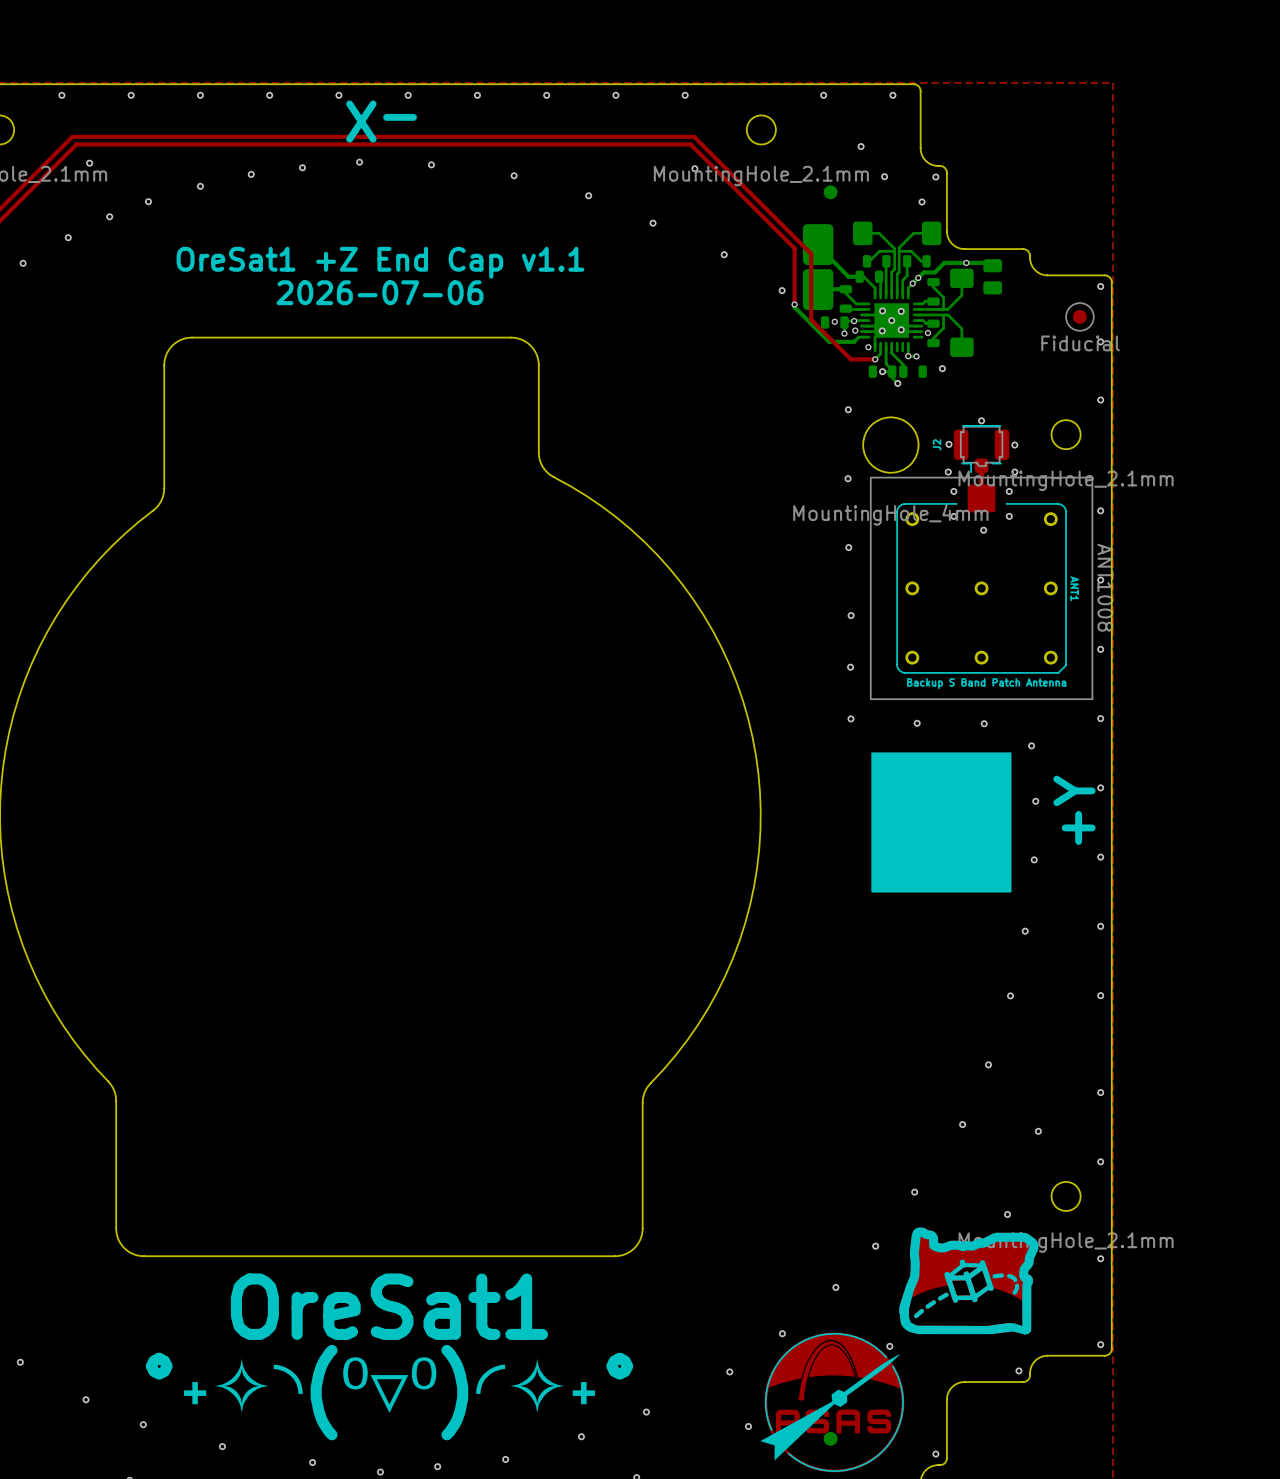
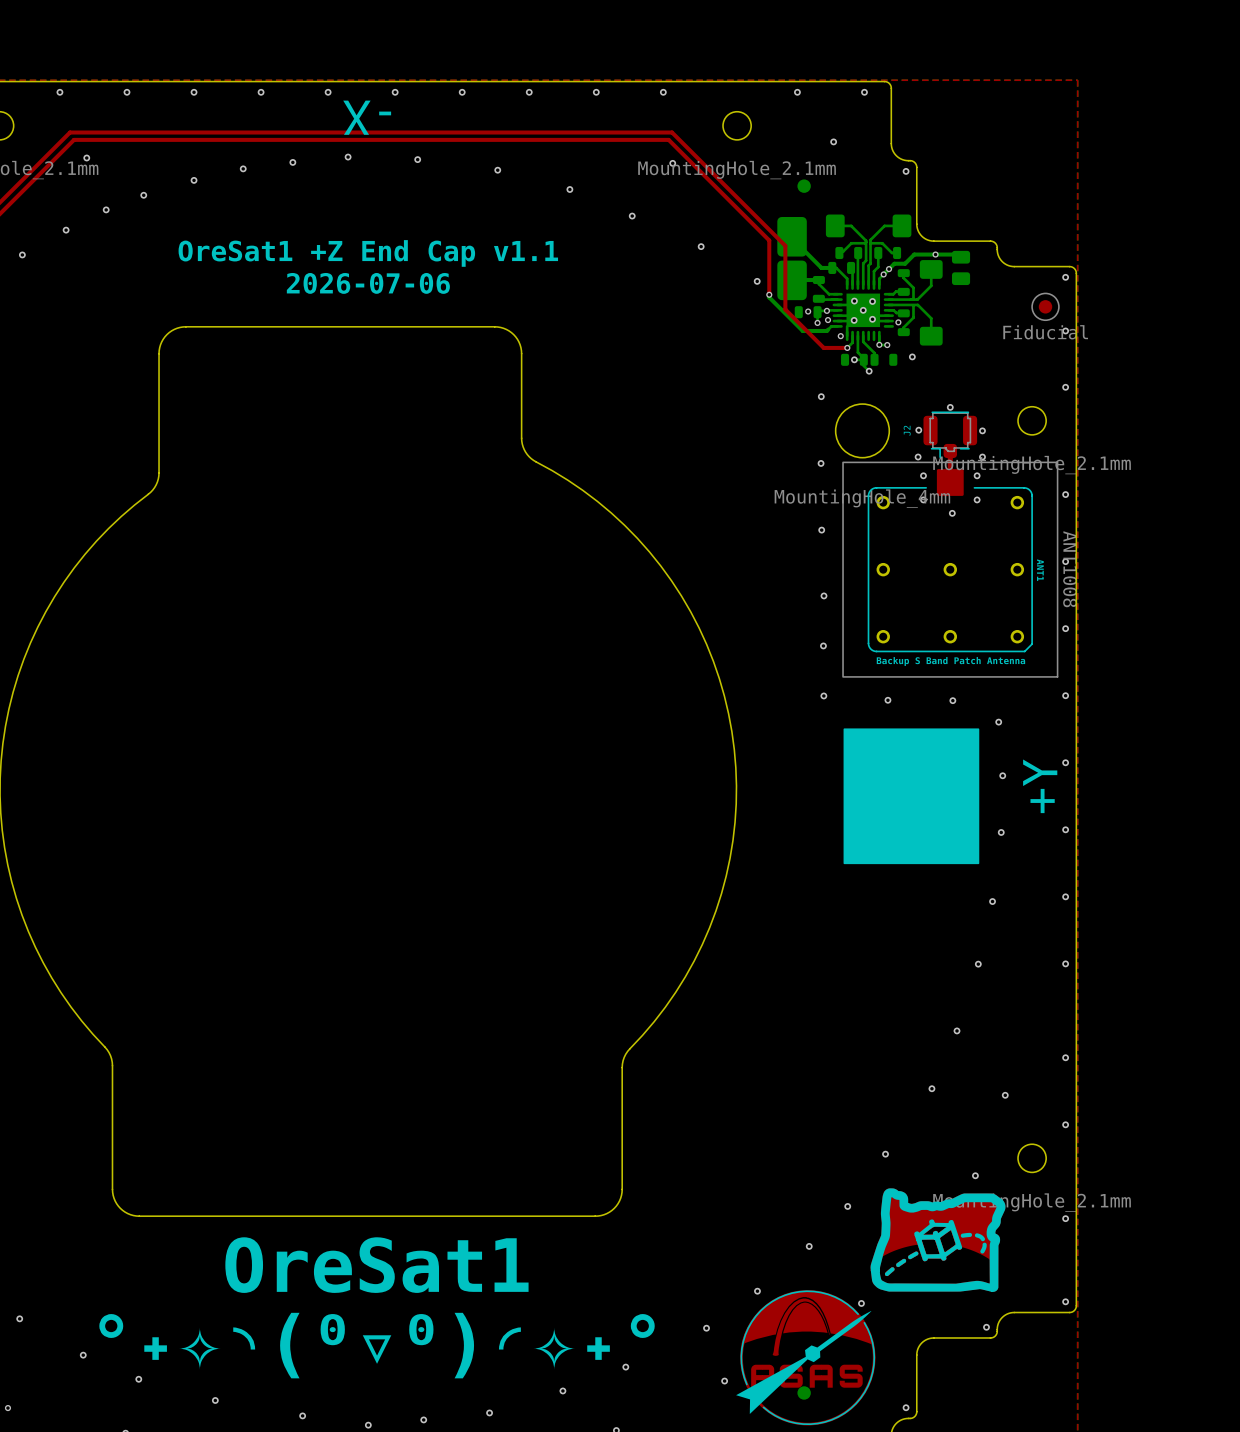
via: (884, 176) -> none
via: (922, 201) -> none
via: none -> (7, 1408)

